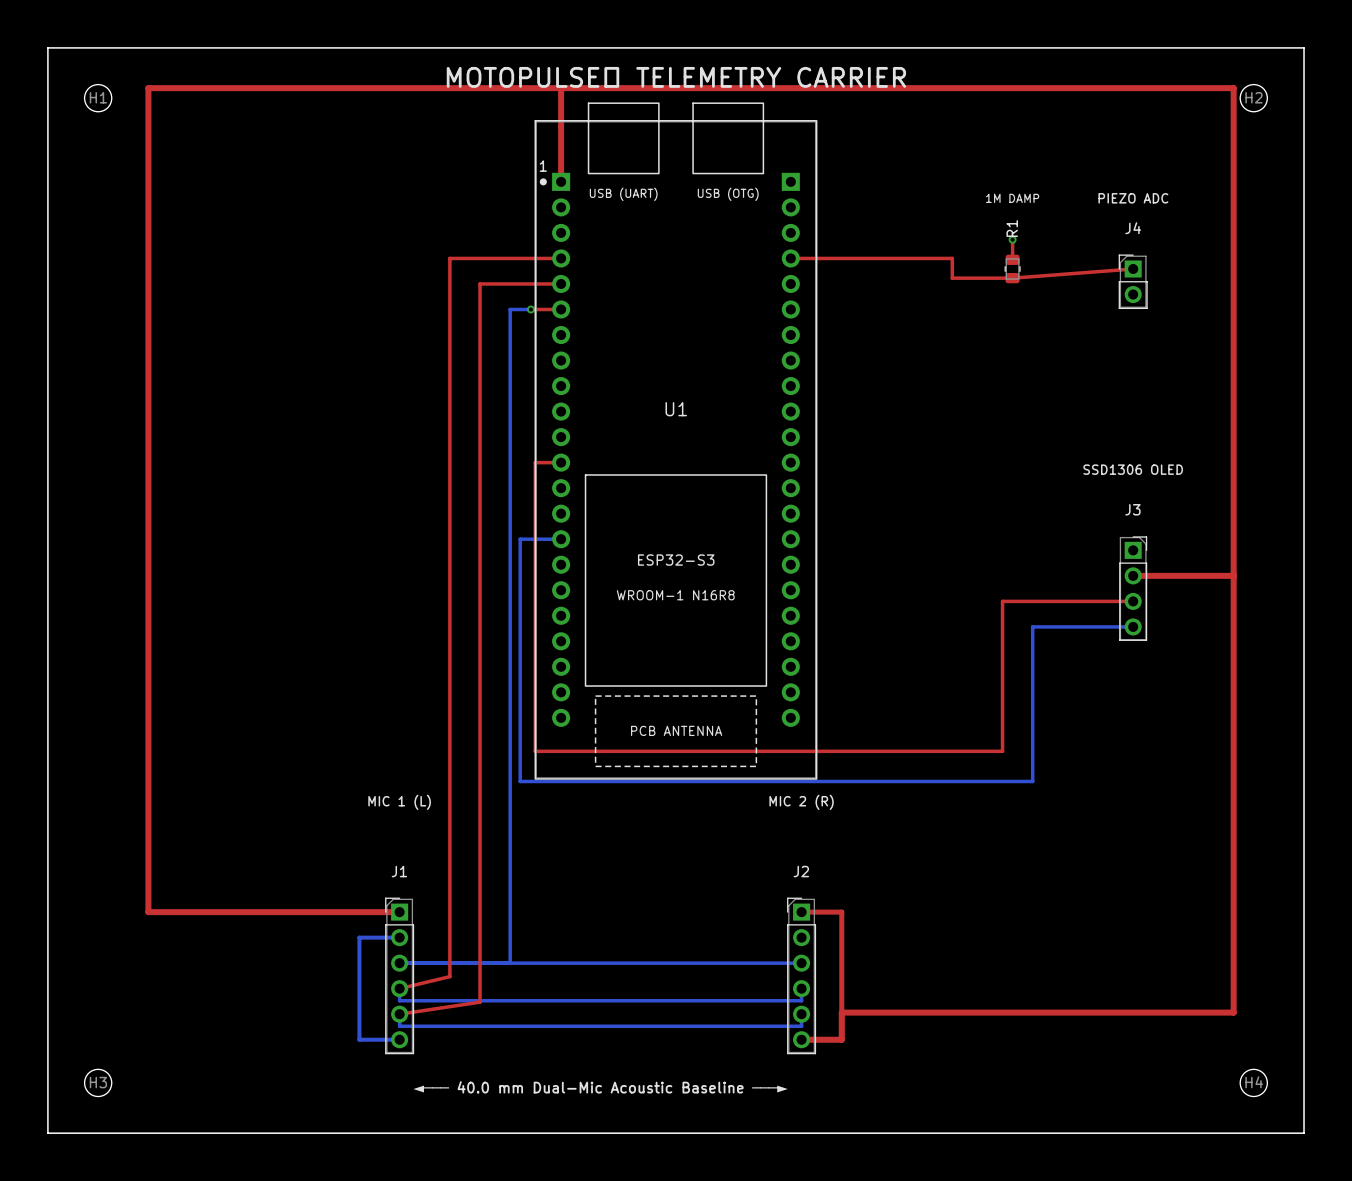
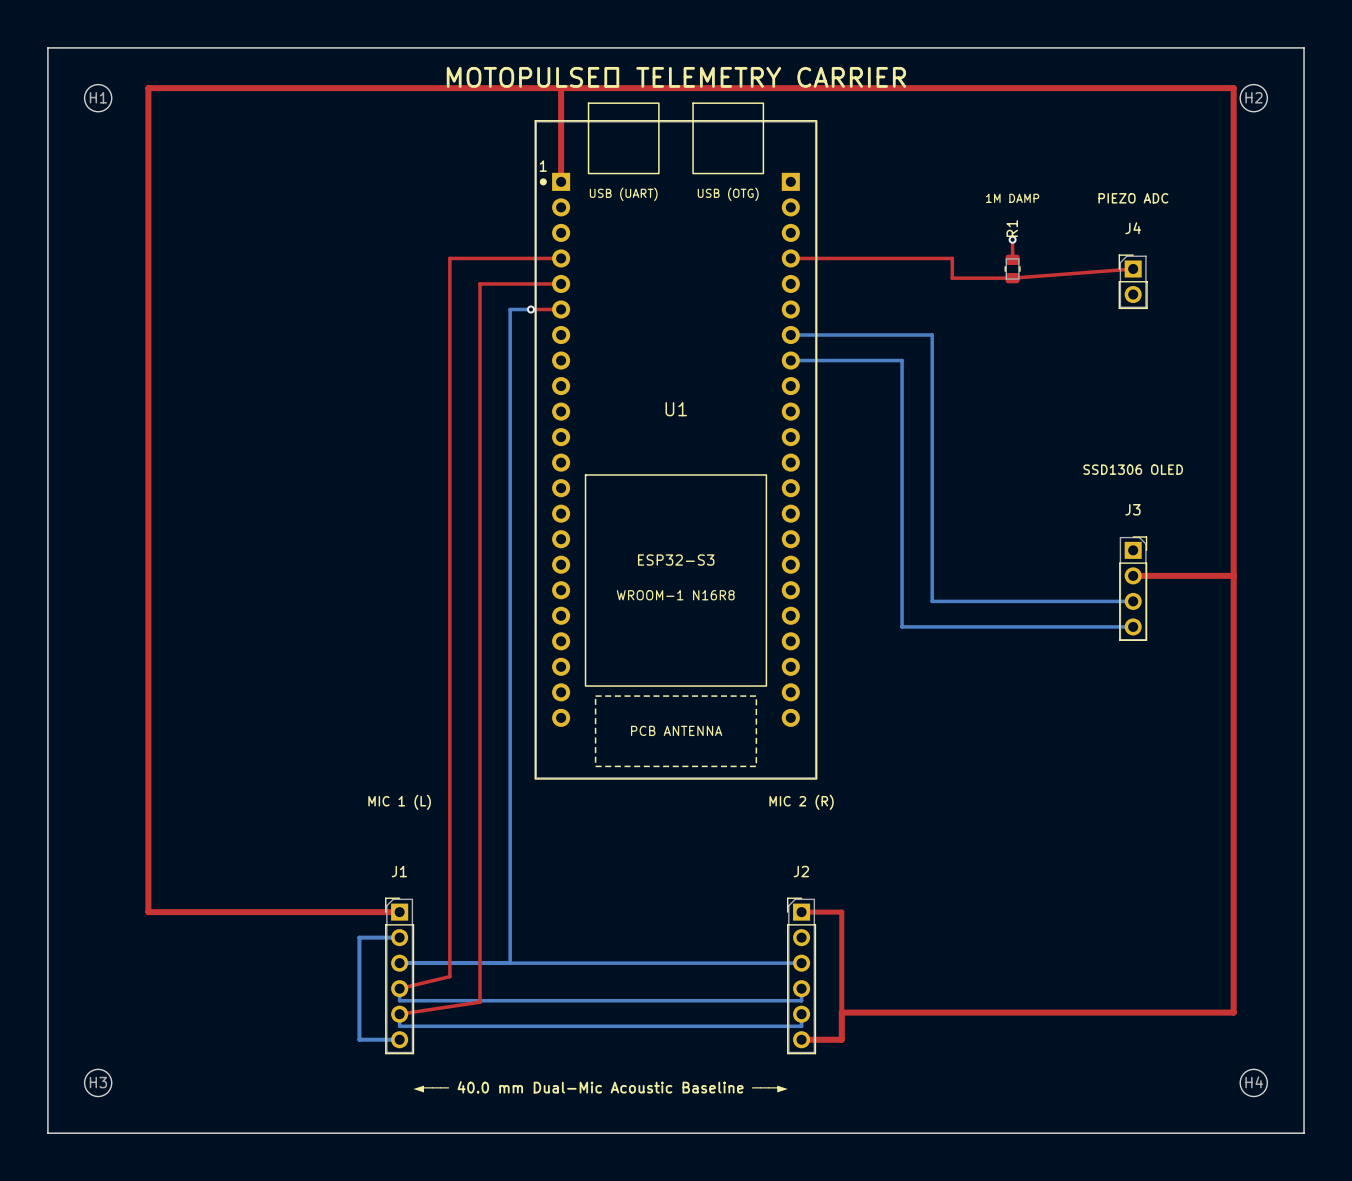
bottom track: none -> (790, 335) (932, 335) (932, 601) (1133, 601)
top track: (561, 462) (535, 462) (535, 751) (1002, 751) (1002, 601) (1133, 601) -> none
bottom track: (561, 539) (520, 539) (520, 781) (1032, 781) (1032, 626) -> (790, 360) (902, 360) (902, 626) (1032, 626)

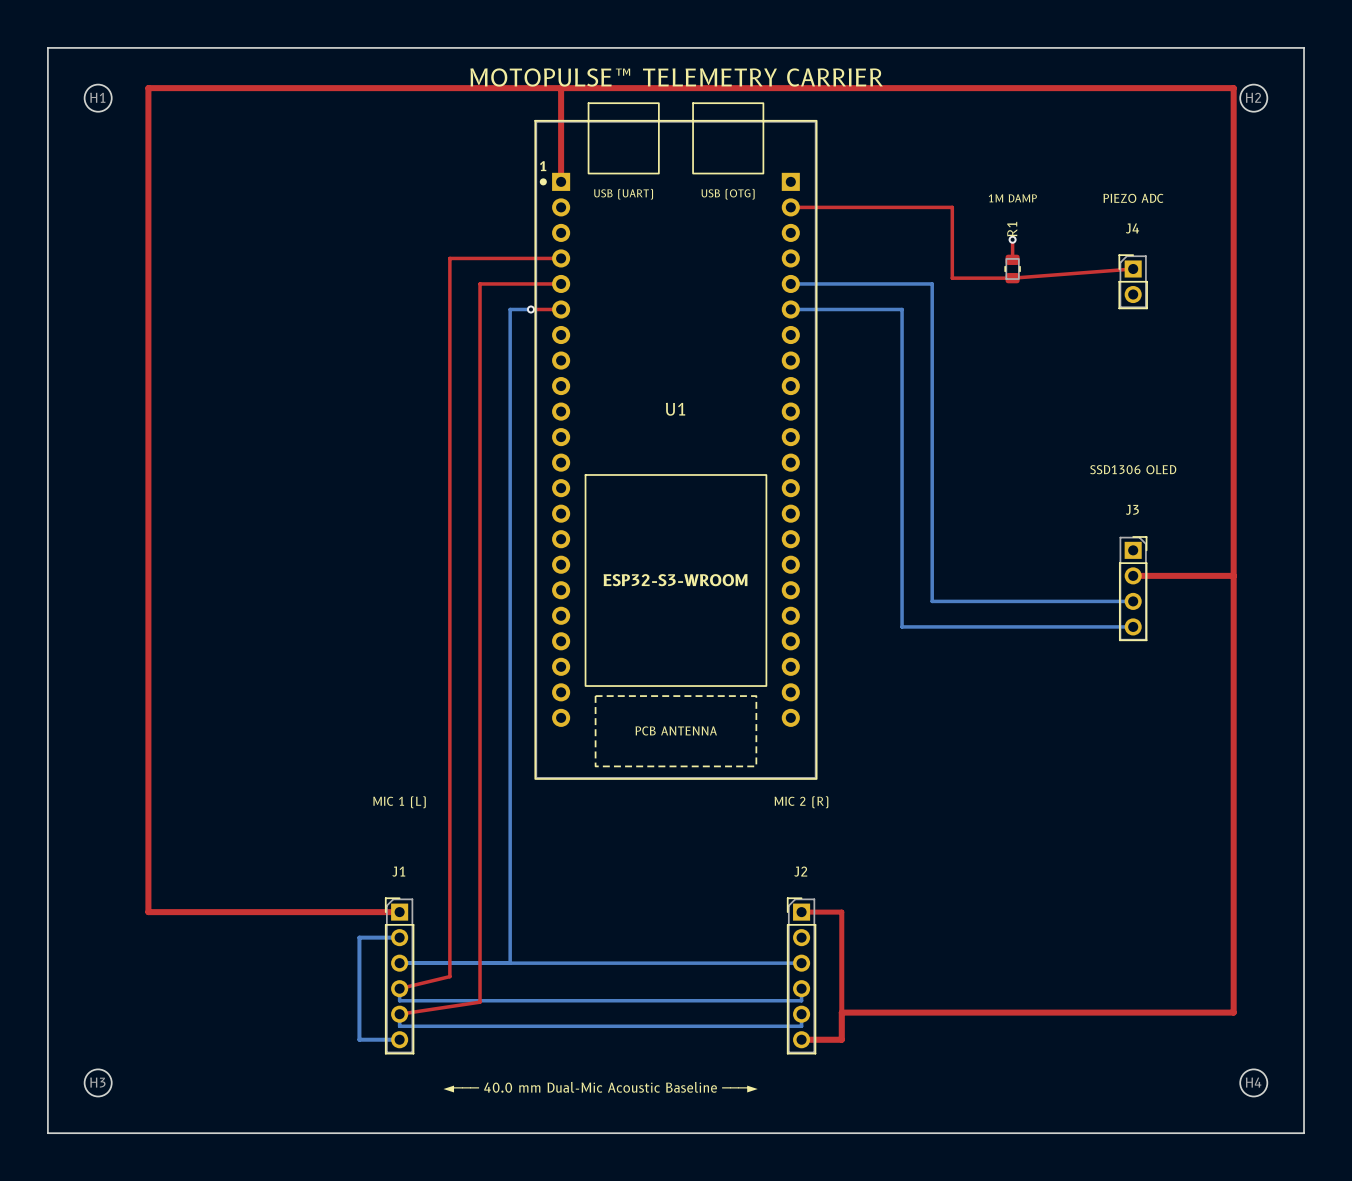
top track: (790, 258) (952, 258) -> (790, 207) (952, 207) (952, 258)
bottom track: (790, 335) (932, 335) -> (790, 283) (932, 283) (932, 335)
bottom track: (790, 360) (902, 360) -> (790, 309) (902, 309) (902, 360)
U1 text: ESP32-S3 (676, 560) -> none
U1 text: none -> ESP32-S3-WROOM (675, 580)
U1 text: WROOM-1 N16R8 (675, 595) -> none

